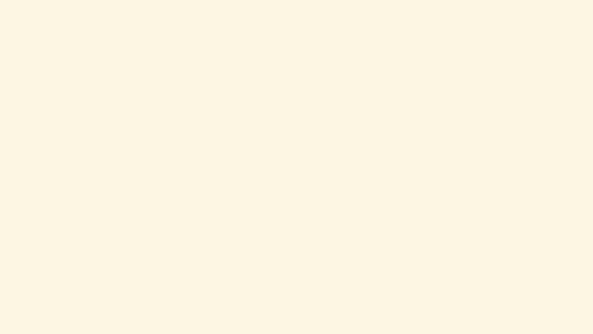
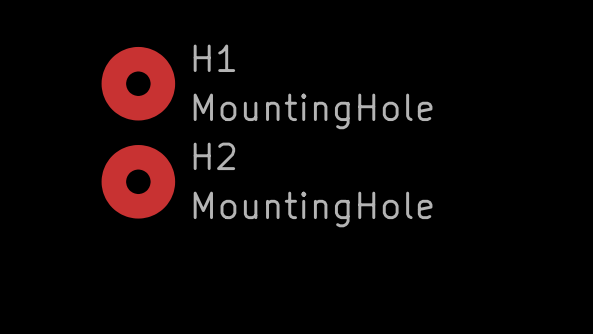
H1: none -> MountingHole (138, 83)
H2: none -> MountingHole (138, 181)

